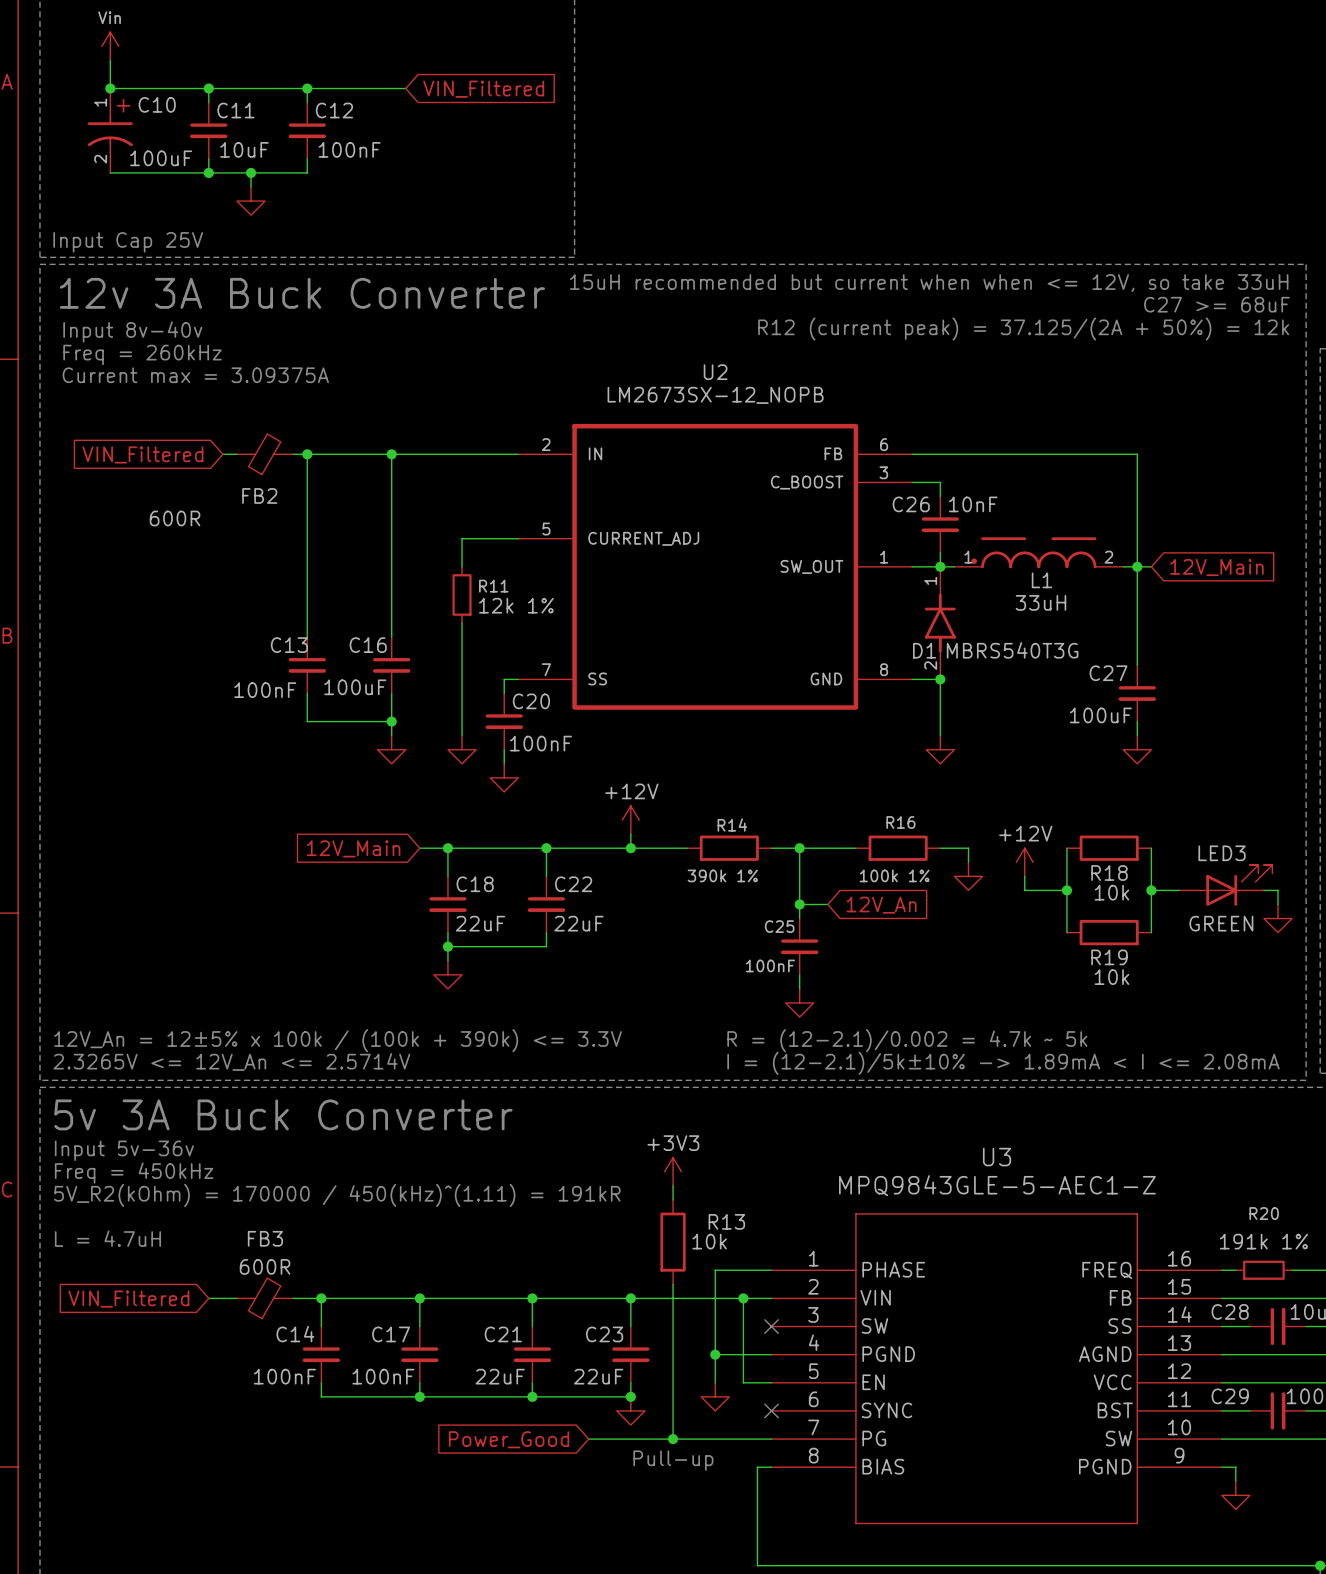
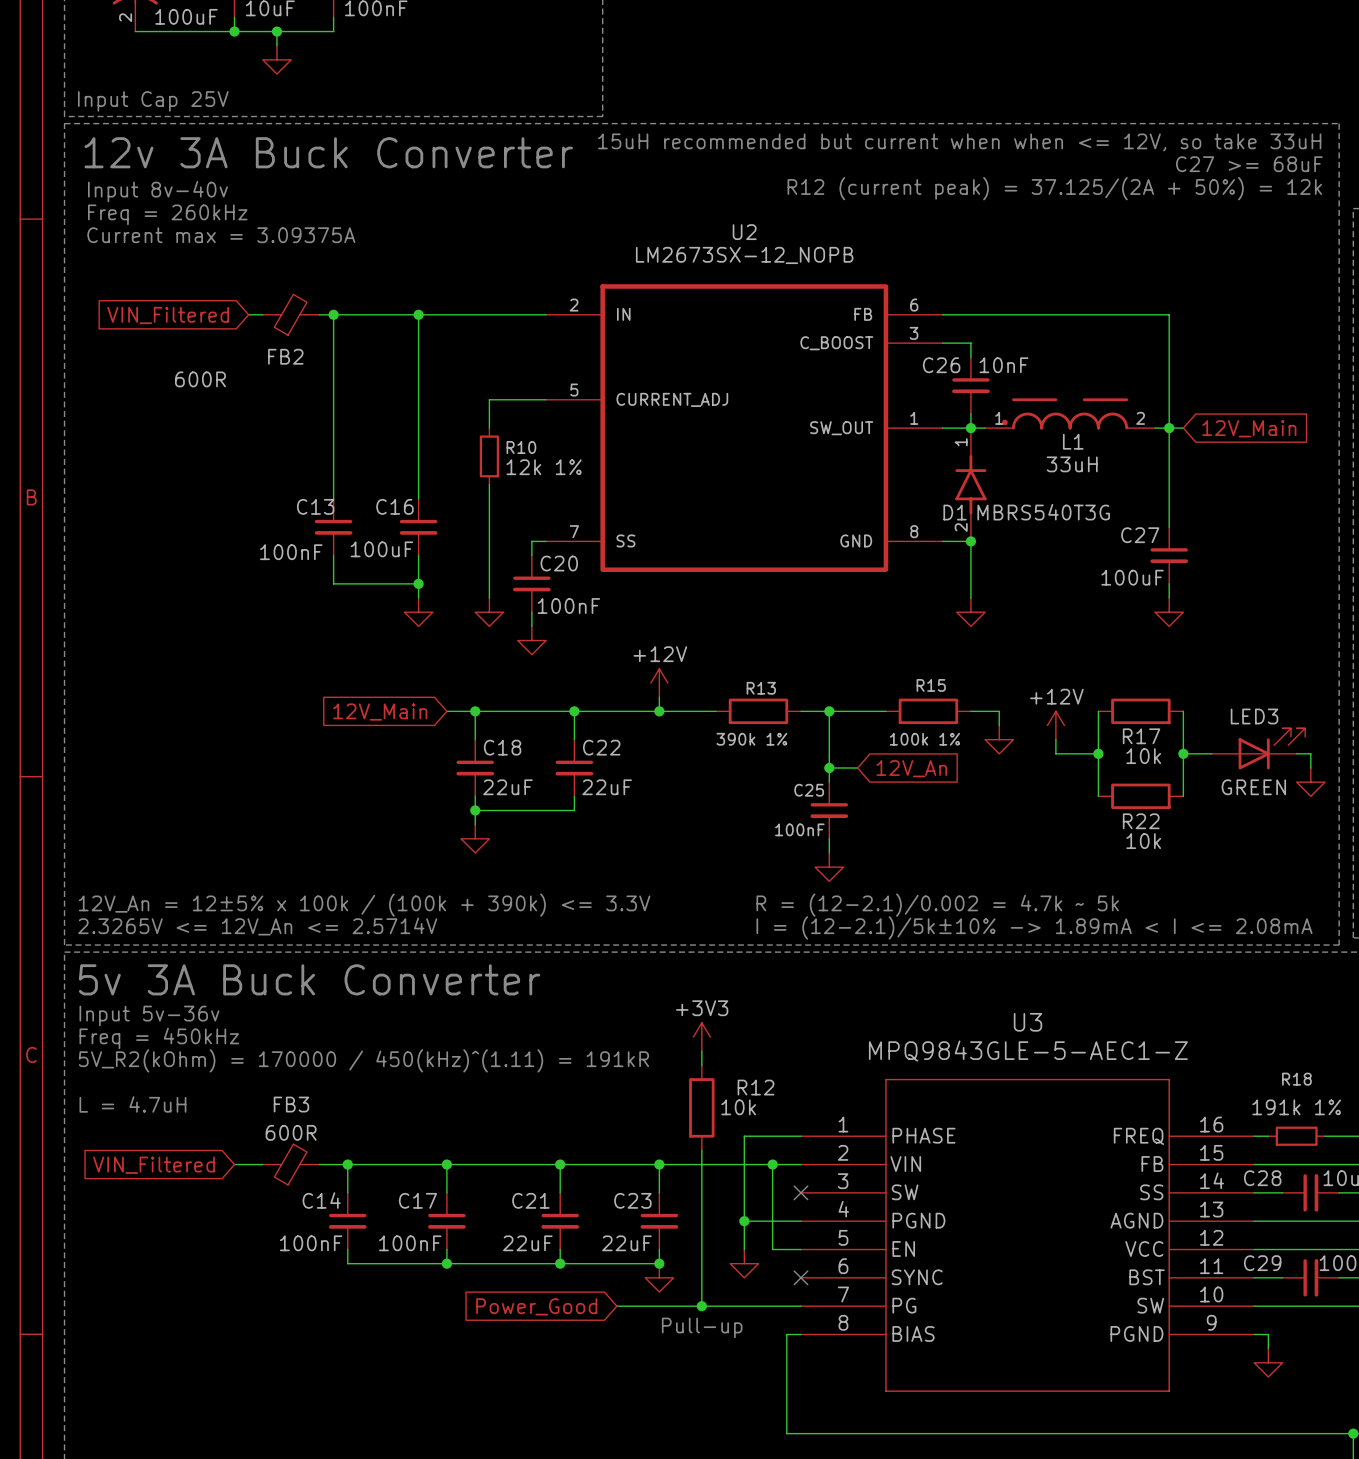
R11 name: R11 (493, 586) -> R10 (521, 447)
R16 name: R16 (900, 822) -> R15 (931, 685)
R14 name: R14 (732, 825) -> R13 (761, 688)
R18 name: R18 (1109, 873) -> R17 (1141, 736)
R19 name: R19 (1109, 957) -> R22 (1141, 821)
R20 name: R20 (1264, 1213) -> R18 (1296, 1079)
R13 name: R13 (726, 1221) -> R12 (755, 1087)

